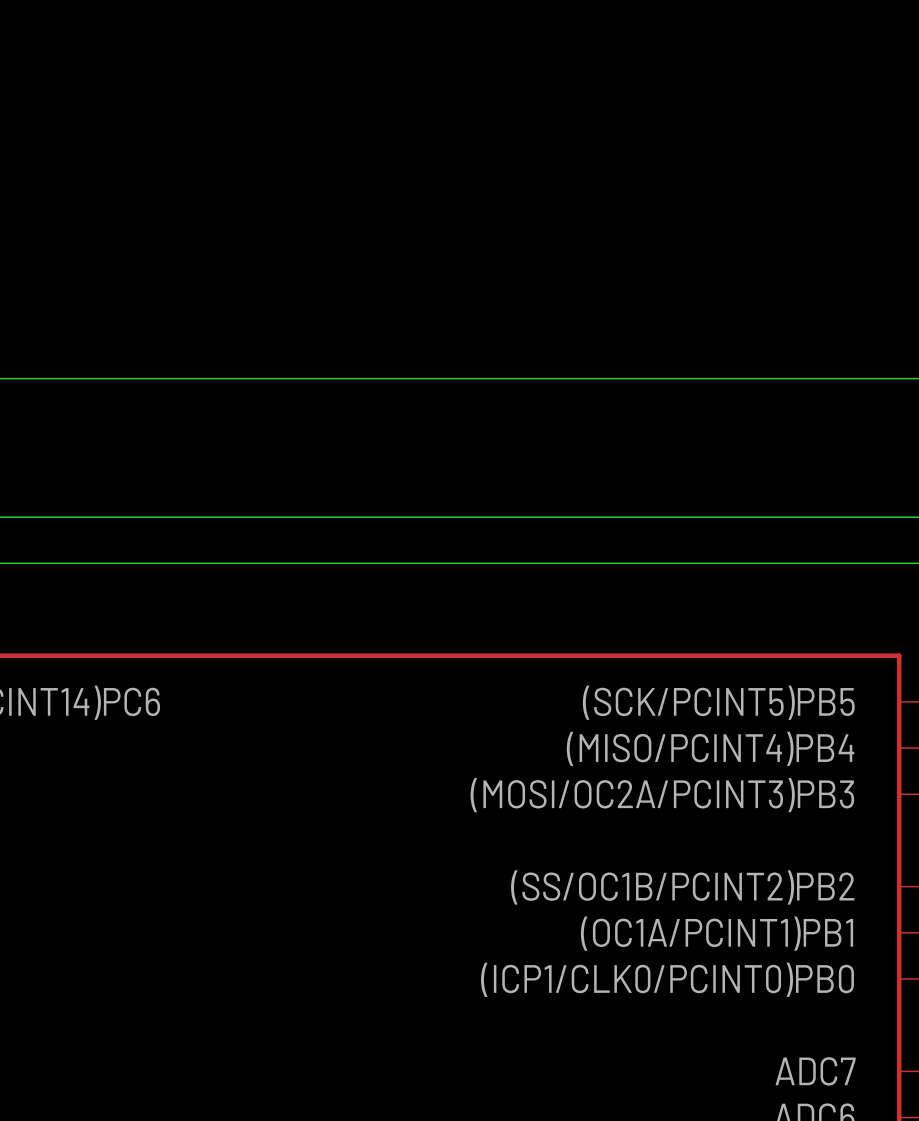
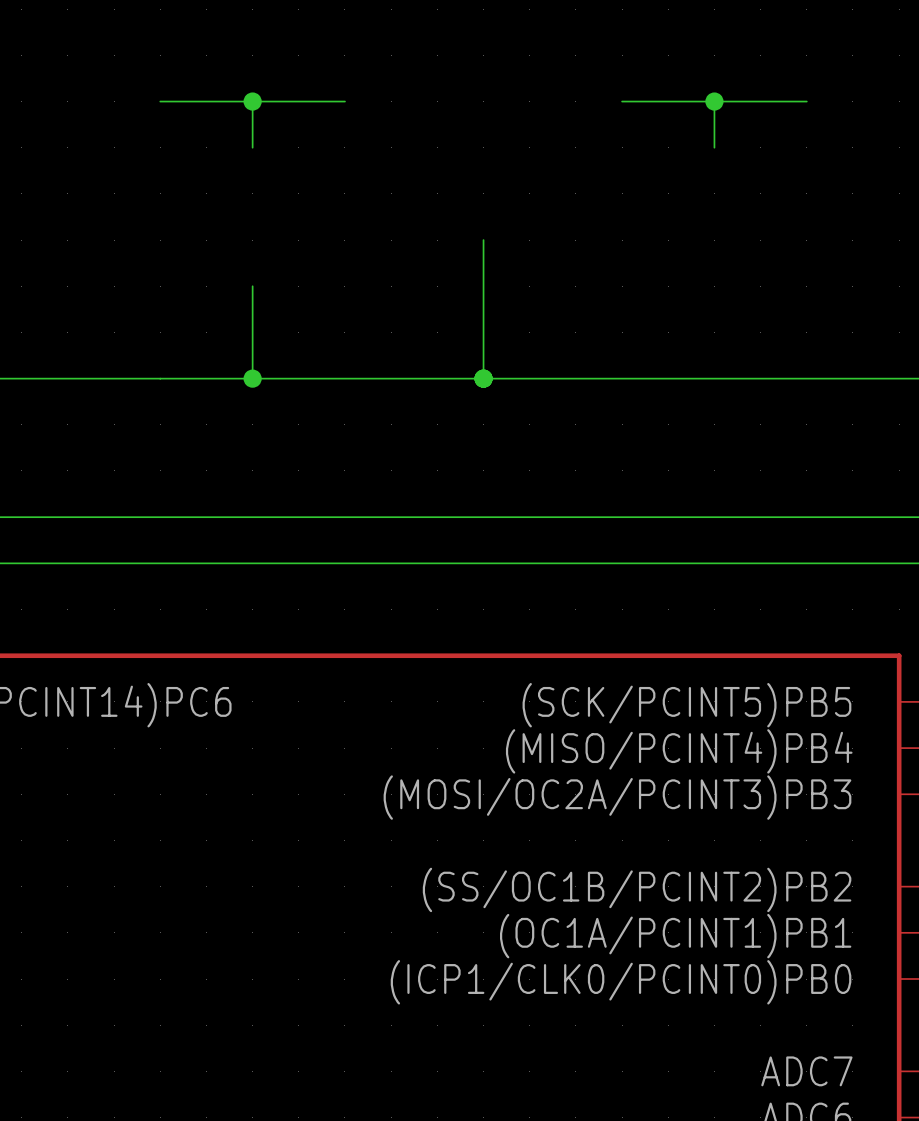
wire: none -> (160, 101) (344, 101)
wire: none -> (252, 101) (252, 147)
junction: none -> (252, 101)
wire: none -> (622, 101) (806, 101)
wire: none -> (714, 101) (714, 147)
junction: none -> (714, 101)
wire: none -> (483, 240) (483, 378)
wire: none -> (252, 286) (252, 378)
junction: none -> (252, 378)
junction: none -> (483, 378)

